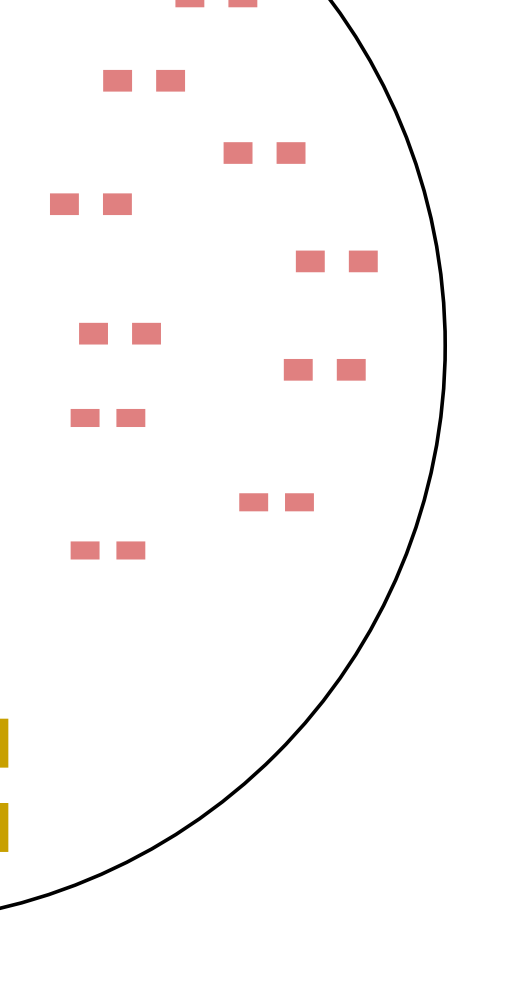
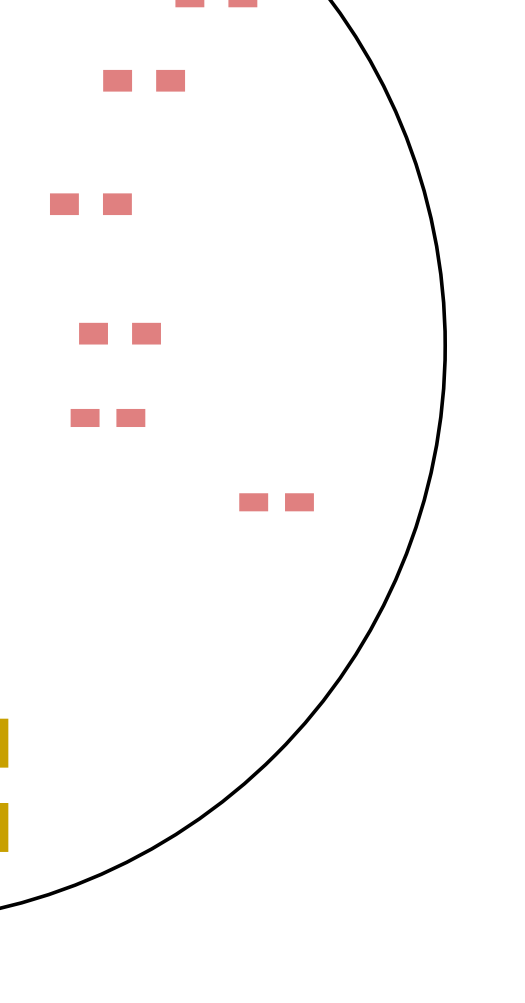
part: (264, 153) -> none
part: (336, 261) -> none
part: (324, 369) -> none
part: (107, 550) -> none

